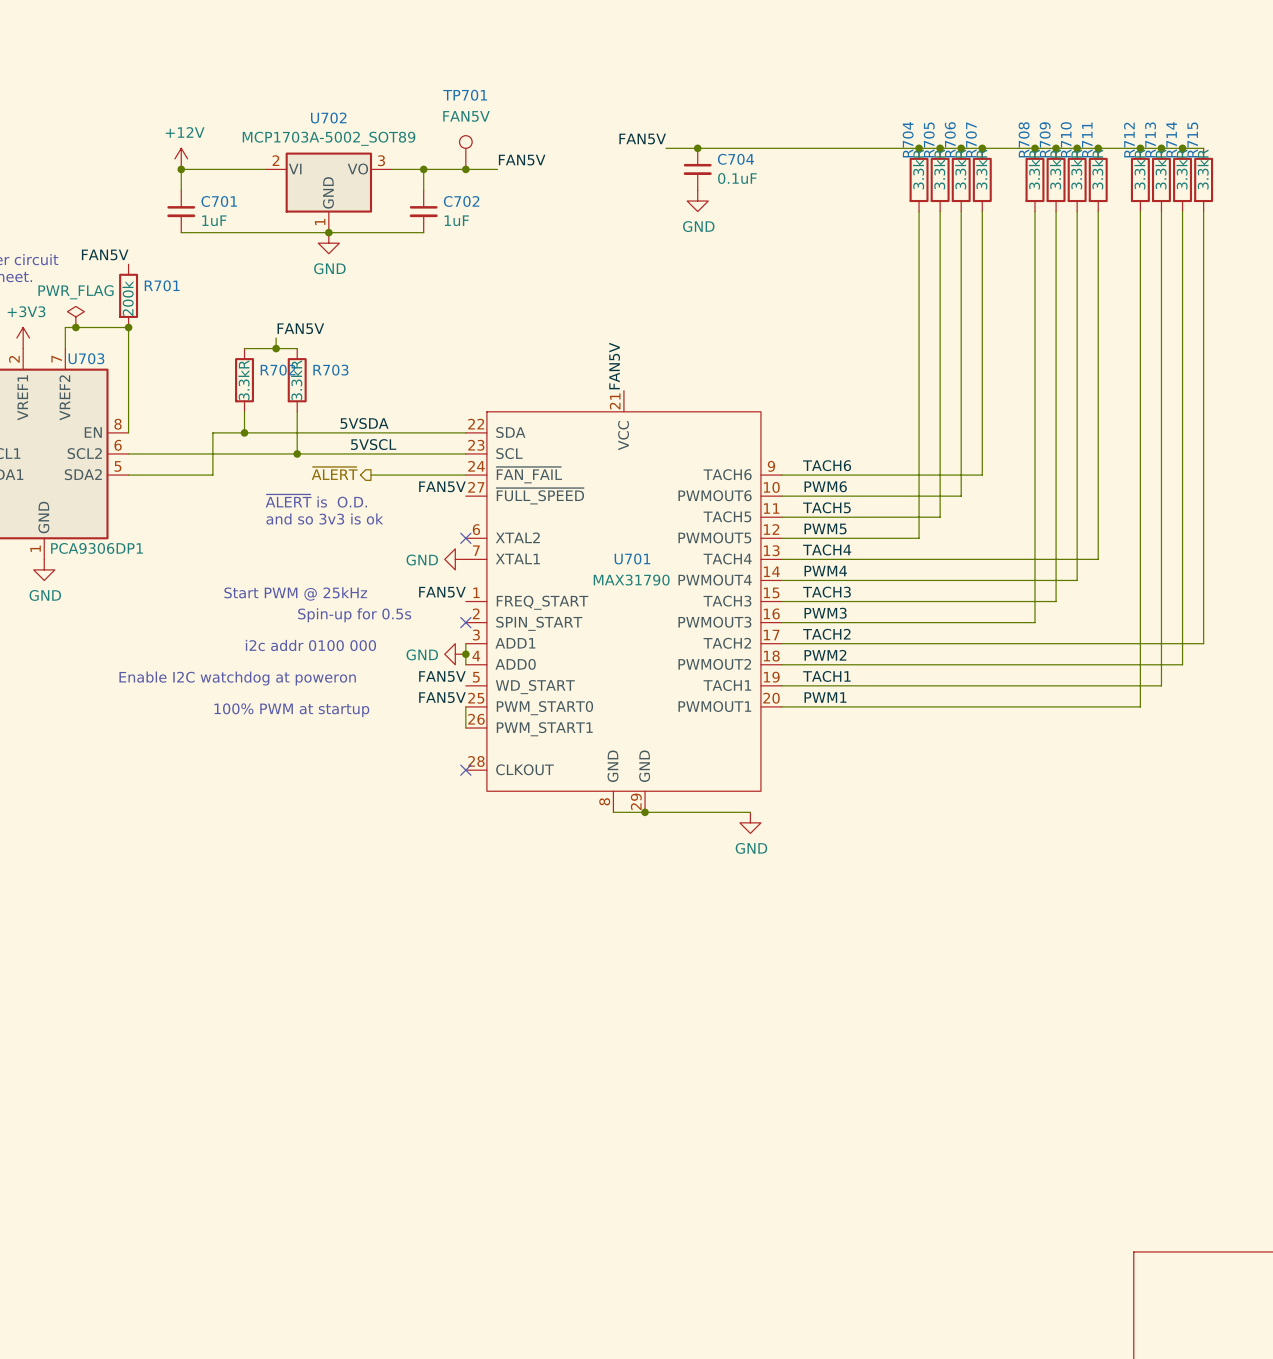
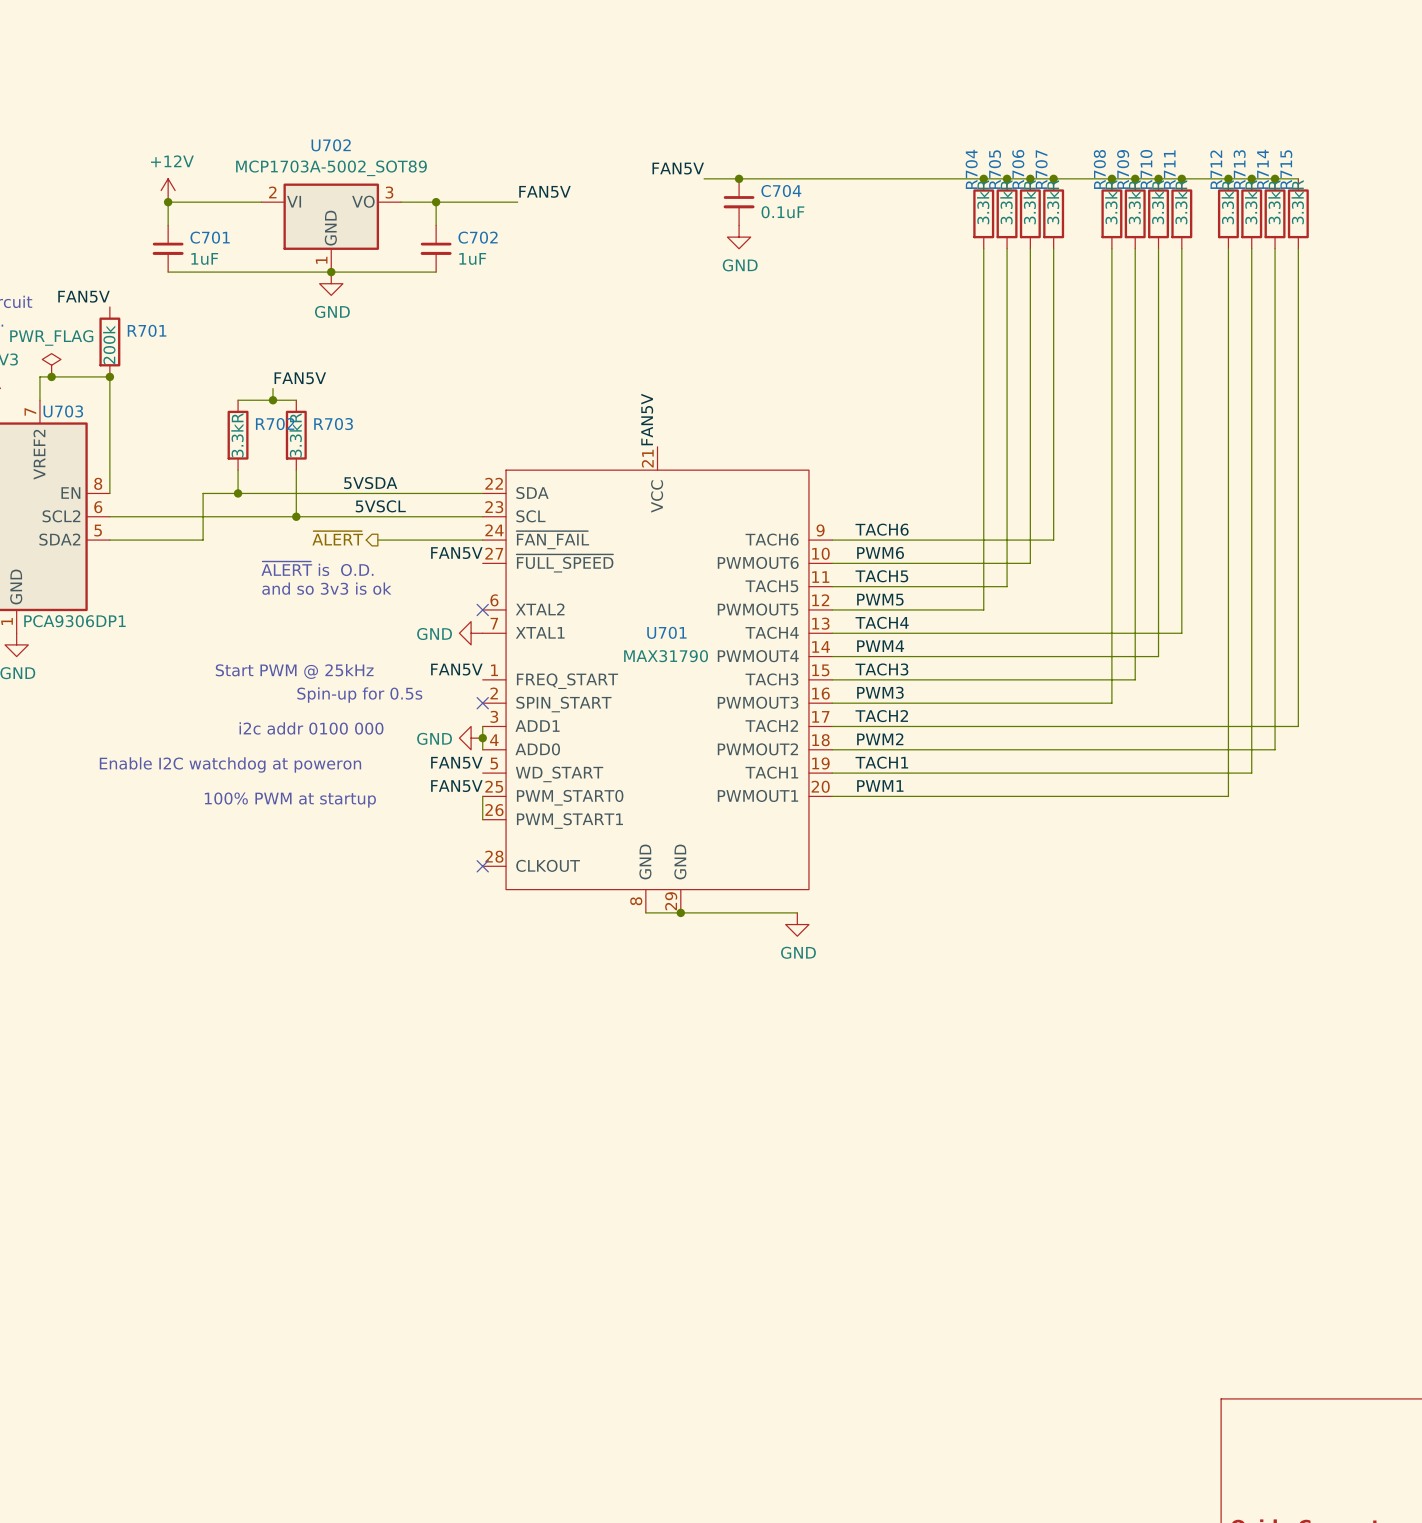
TP701: FAN5V (465, 152) -> none
junction: (465, 169) -> none

